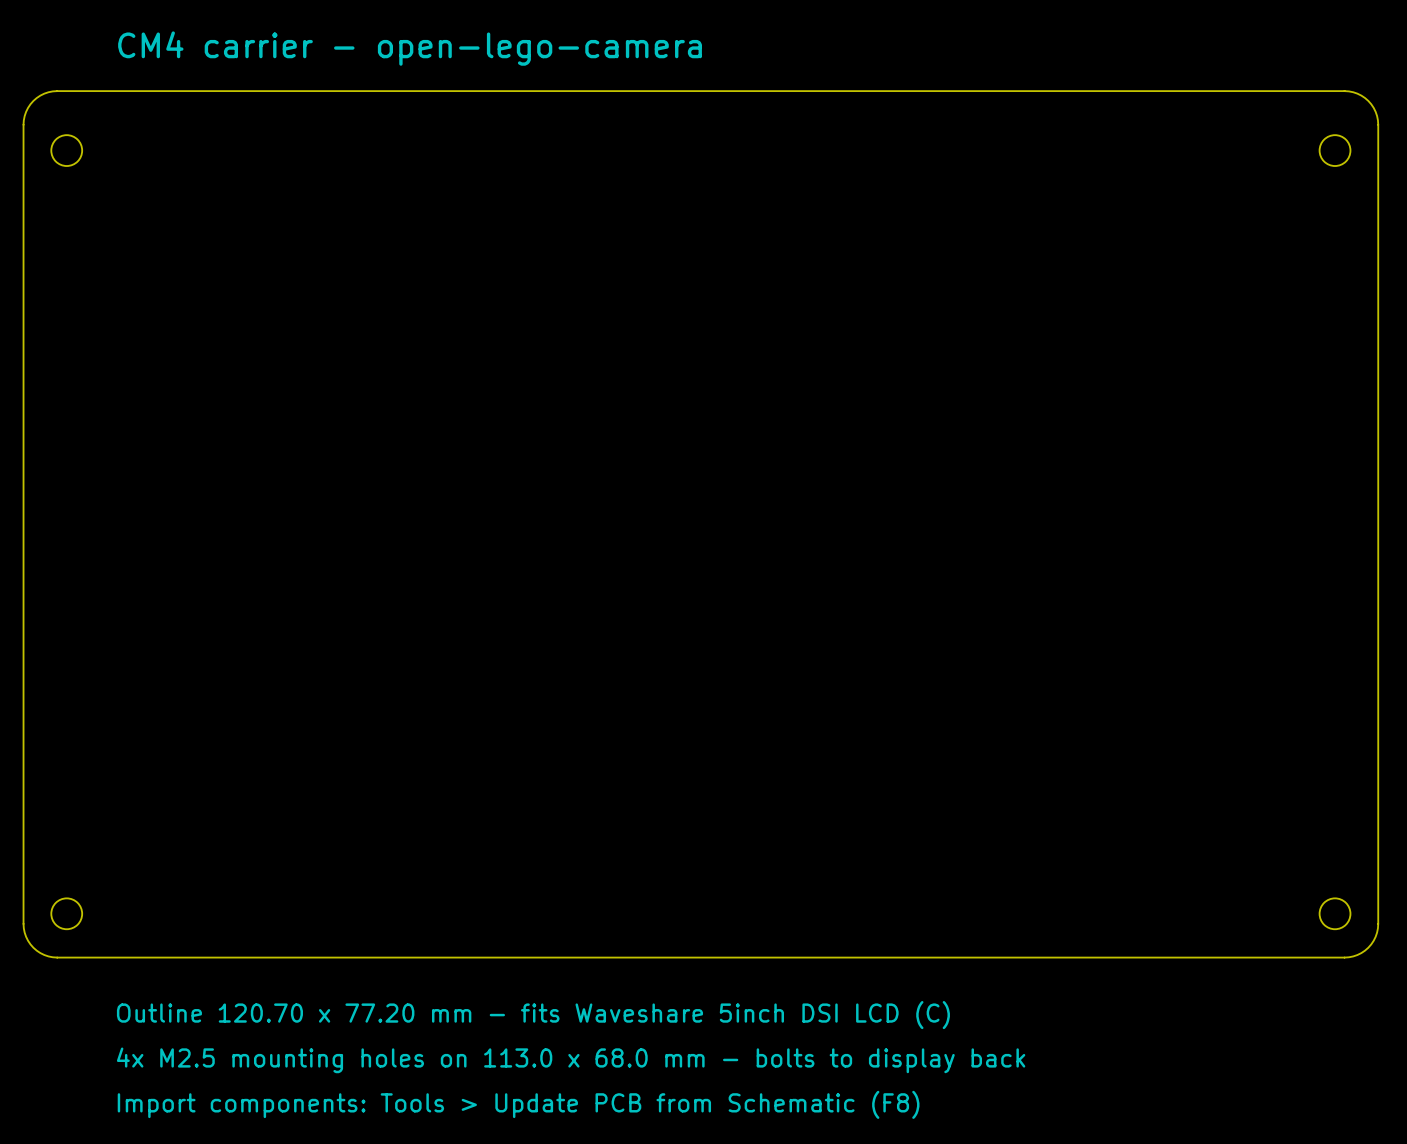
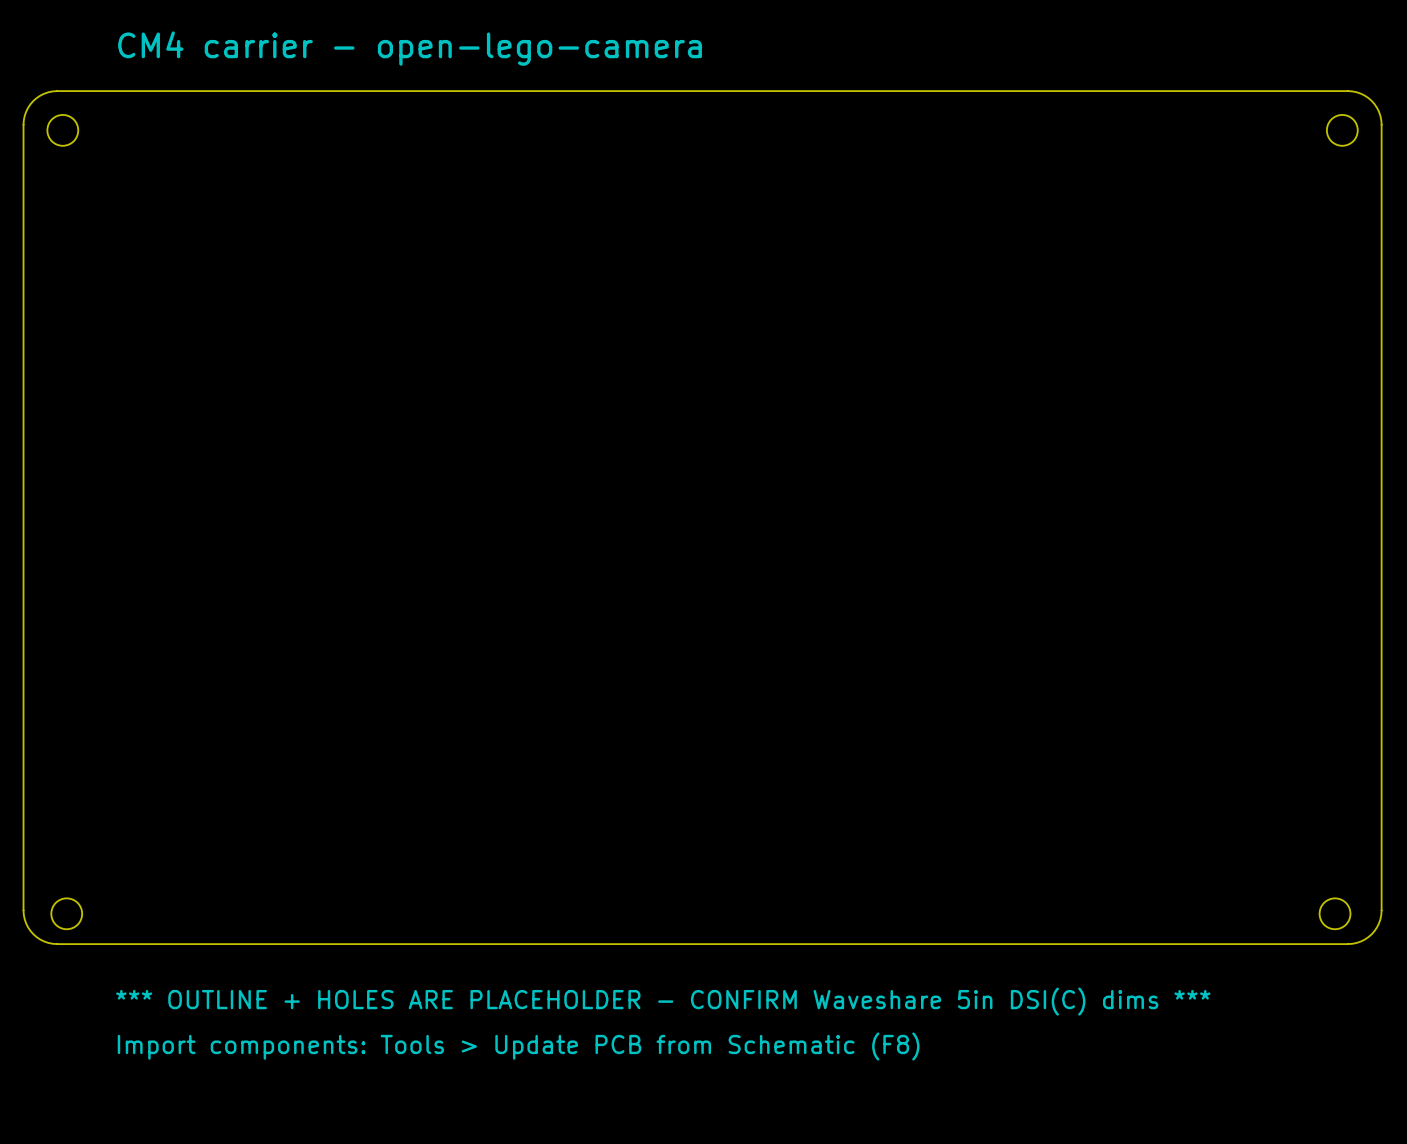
board edge: (1344, 91) (1357, 93) (1368, 100) (1375, 111) (1378, 124) (1378, 923) (1373, 940) (1361, 953) (1344, 957) (57, 957) (44, 955) (30, 944) (24, 932) (23, 910) -> (1344, 91) (1360, 93) (1371, 100) (1379, 111) (1381, 124) (1381, 910) (1377, 927) (1364, 939) (1347, 944) (57, 944) (44, 941) (33, 934) (26, 923) (23, 910)
round board edge: none -> [46, 114, 79, 147]
round board edge: [50, 134, 83, 167] -> none
round board edge position: (1335, 150) -> (1342, 130)
text: none -> *** OUTLINE + HOLES ARE PLACEHOLDER - CONFIRM Waveshare 5in DSI(C) dims *** (663, 1001)
text: Outline 120.70 x 77.20 mm - fits Waveshare 5inch DSI LCD (C) (533, 1015) -> none
text: 4x M2.5 mounting holes on 113.0 x 68.0 mm - bolts to display back (571, 1060) -> none
text position: Import components: Tools > Update PCB from Schematic (F8) (518, 1104) -> Import components: Tools > Update PCB from Schematic (F8) (518, 1046)

